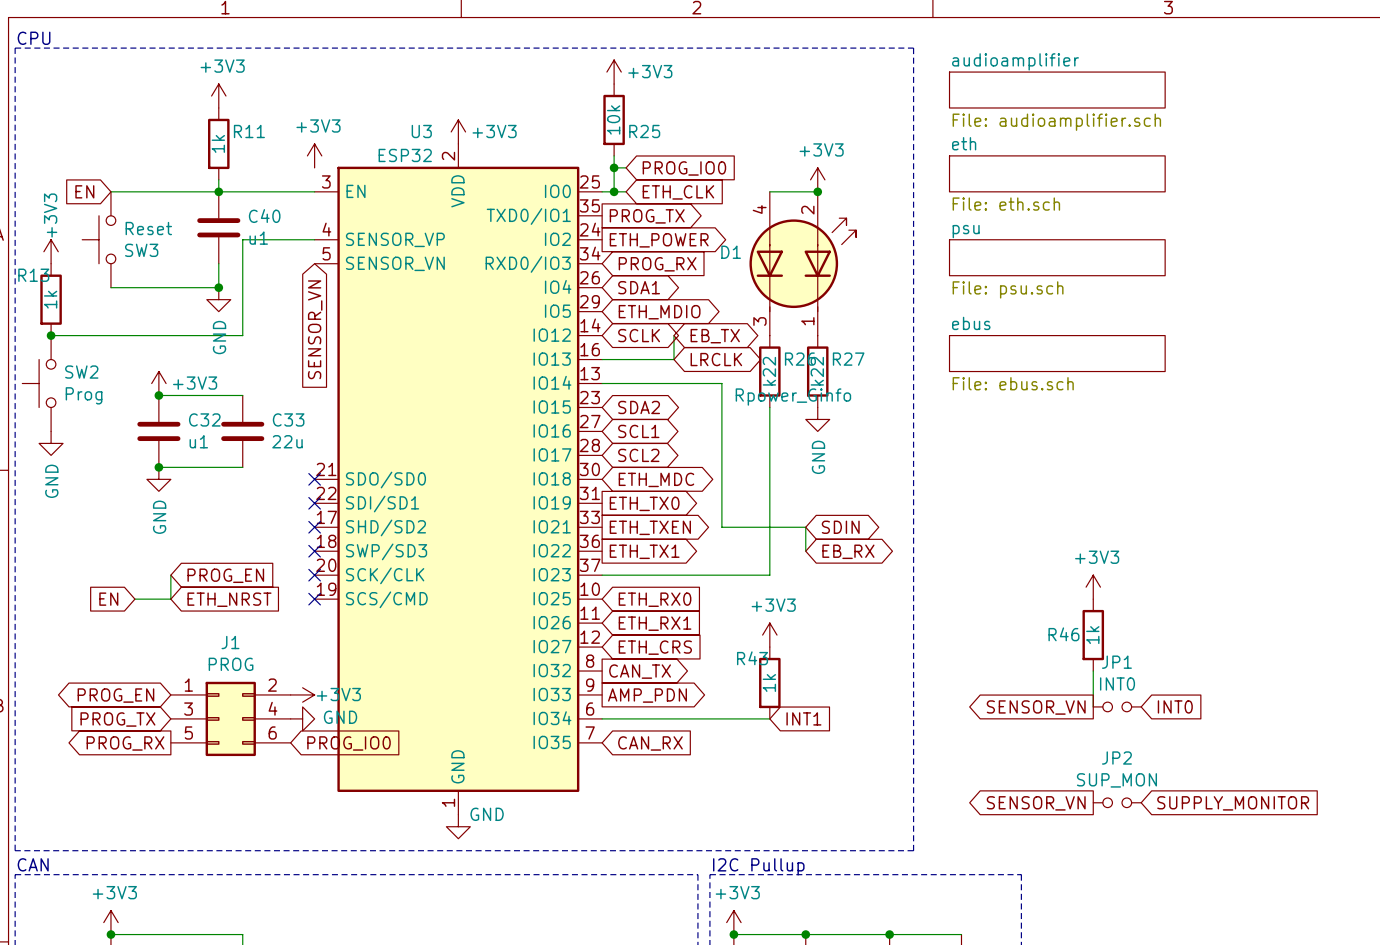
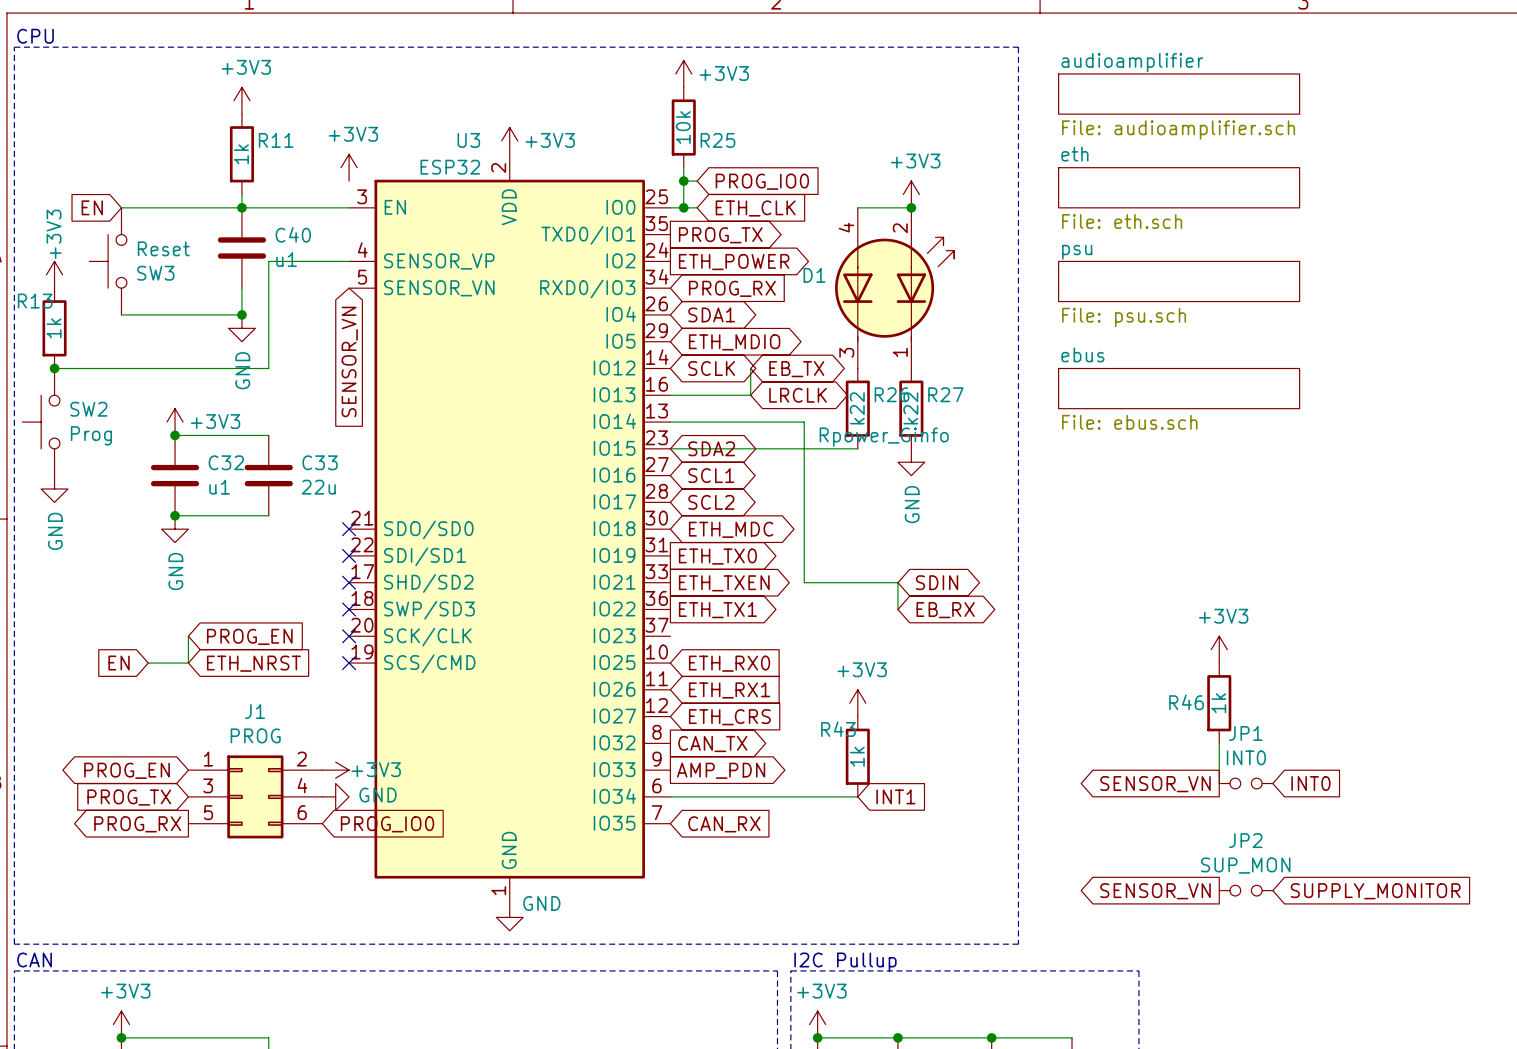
wire: (769, 407) (769, 575) (602, 575) -> (857, 448) (670, 448)

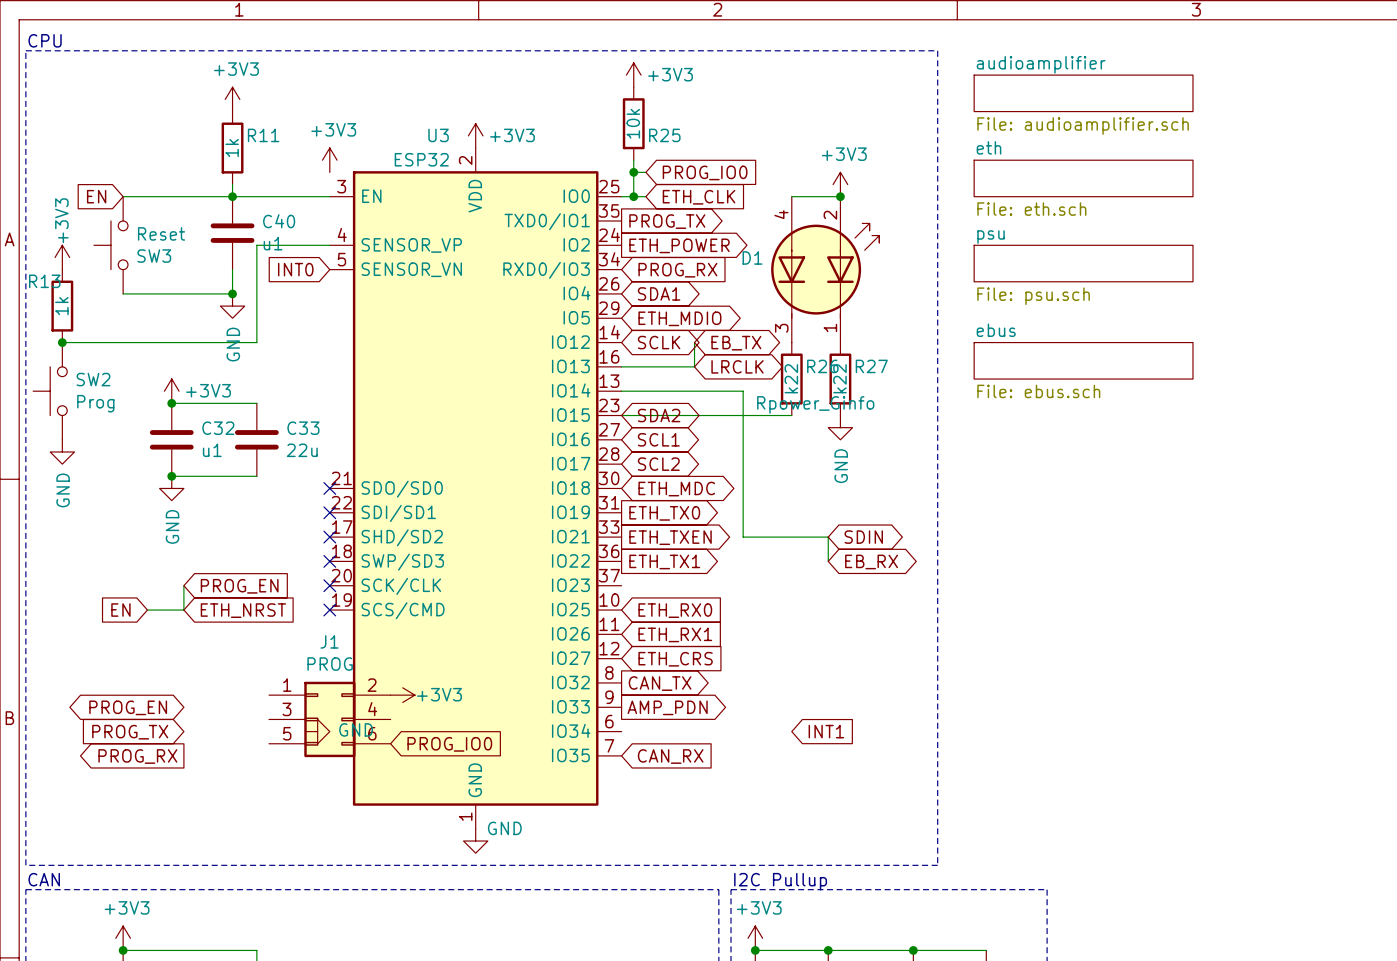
global label: SENSOR_VN (349, 361) -> INT0 (295, 269)
power symbol: +3V3 (1219, 649) -> none
power symbol: +3V3 (857, 703) -> none
R46: 1k (1219, 703) -> none
wire: (1219, 743) (1219, 783) -> none
R43: 1k (857, 756) -> none
power symbol position: +3V3 (335, 770) -> +3V3 (402, 695)
JP1: INT0 (1246, 783) -> none
global label: INT0 (1310, 783) -> none
global label: SENSOR_VN (1155, 784) -> none
J1 position: (255, 796) -> (329, 719)
wire: (670, 796) (857, 796) -> none
global label position: PROG_IO0 (387, 824) -> PROG_IO0 (449, 744)
JP2: SUP_MON (1246, 890) -> none
global label: SENSOR_VN (1155, 891) -> none
global label: SUPPLY_MONITOR (1375, 891) -> none

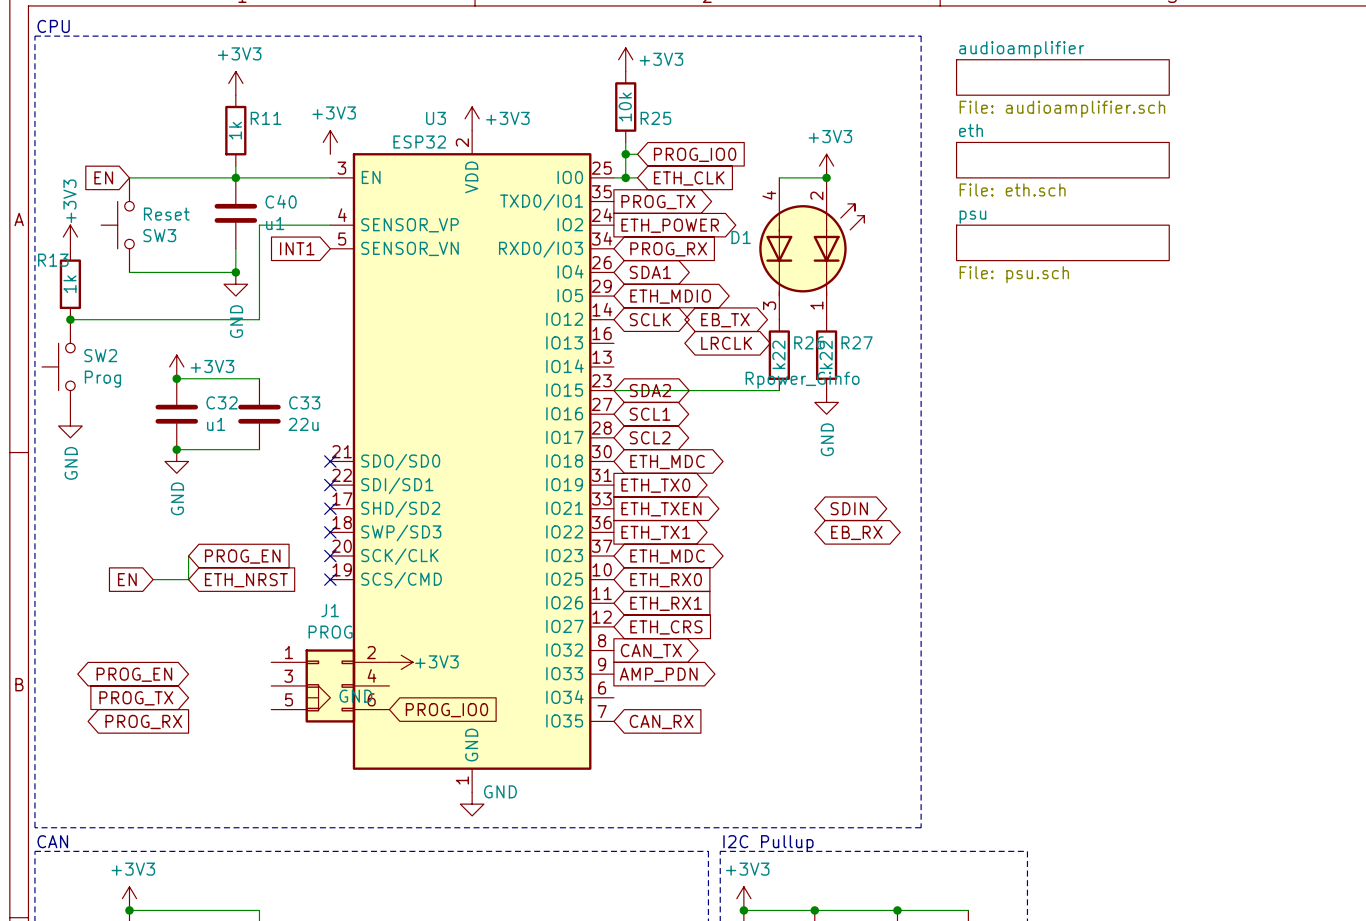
global label: INT0 (295, 269) -> INT1 (297, 248)
wire: (694, 342) (694, 366) (621, 366) -> none
sheet ebus: File: ebus.sch (1083, 360) -> none
wire: (621, 391) (743, 391) (743, 537) (828, 537) (828, 561) -> none
global label: none -> ETH_MDC (667, 556)
global label: INT1 (826, 731) -> none

